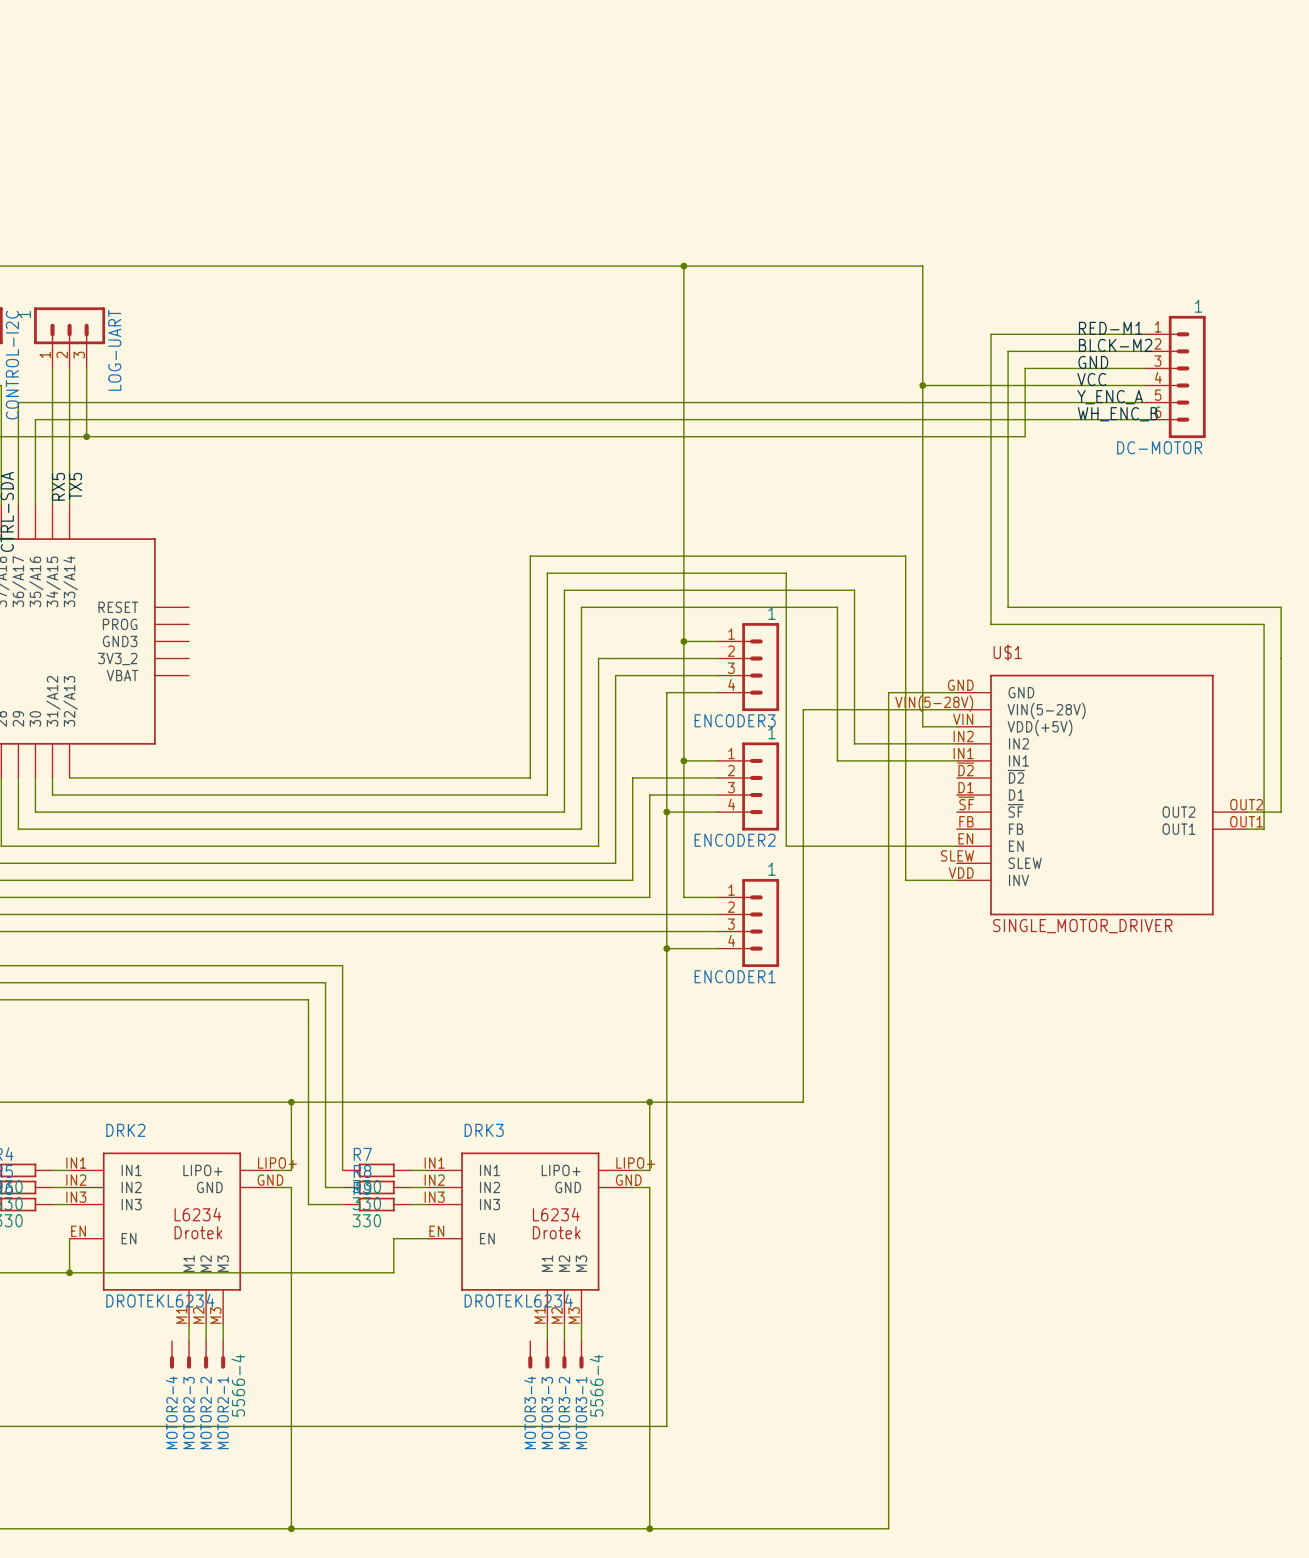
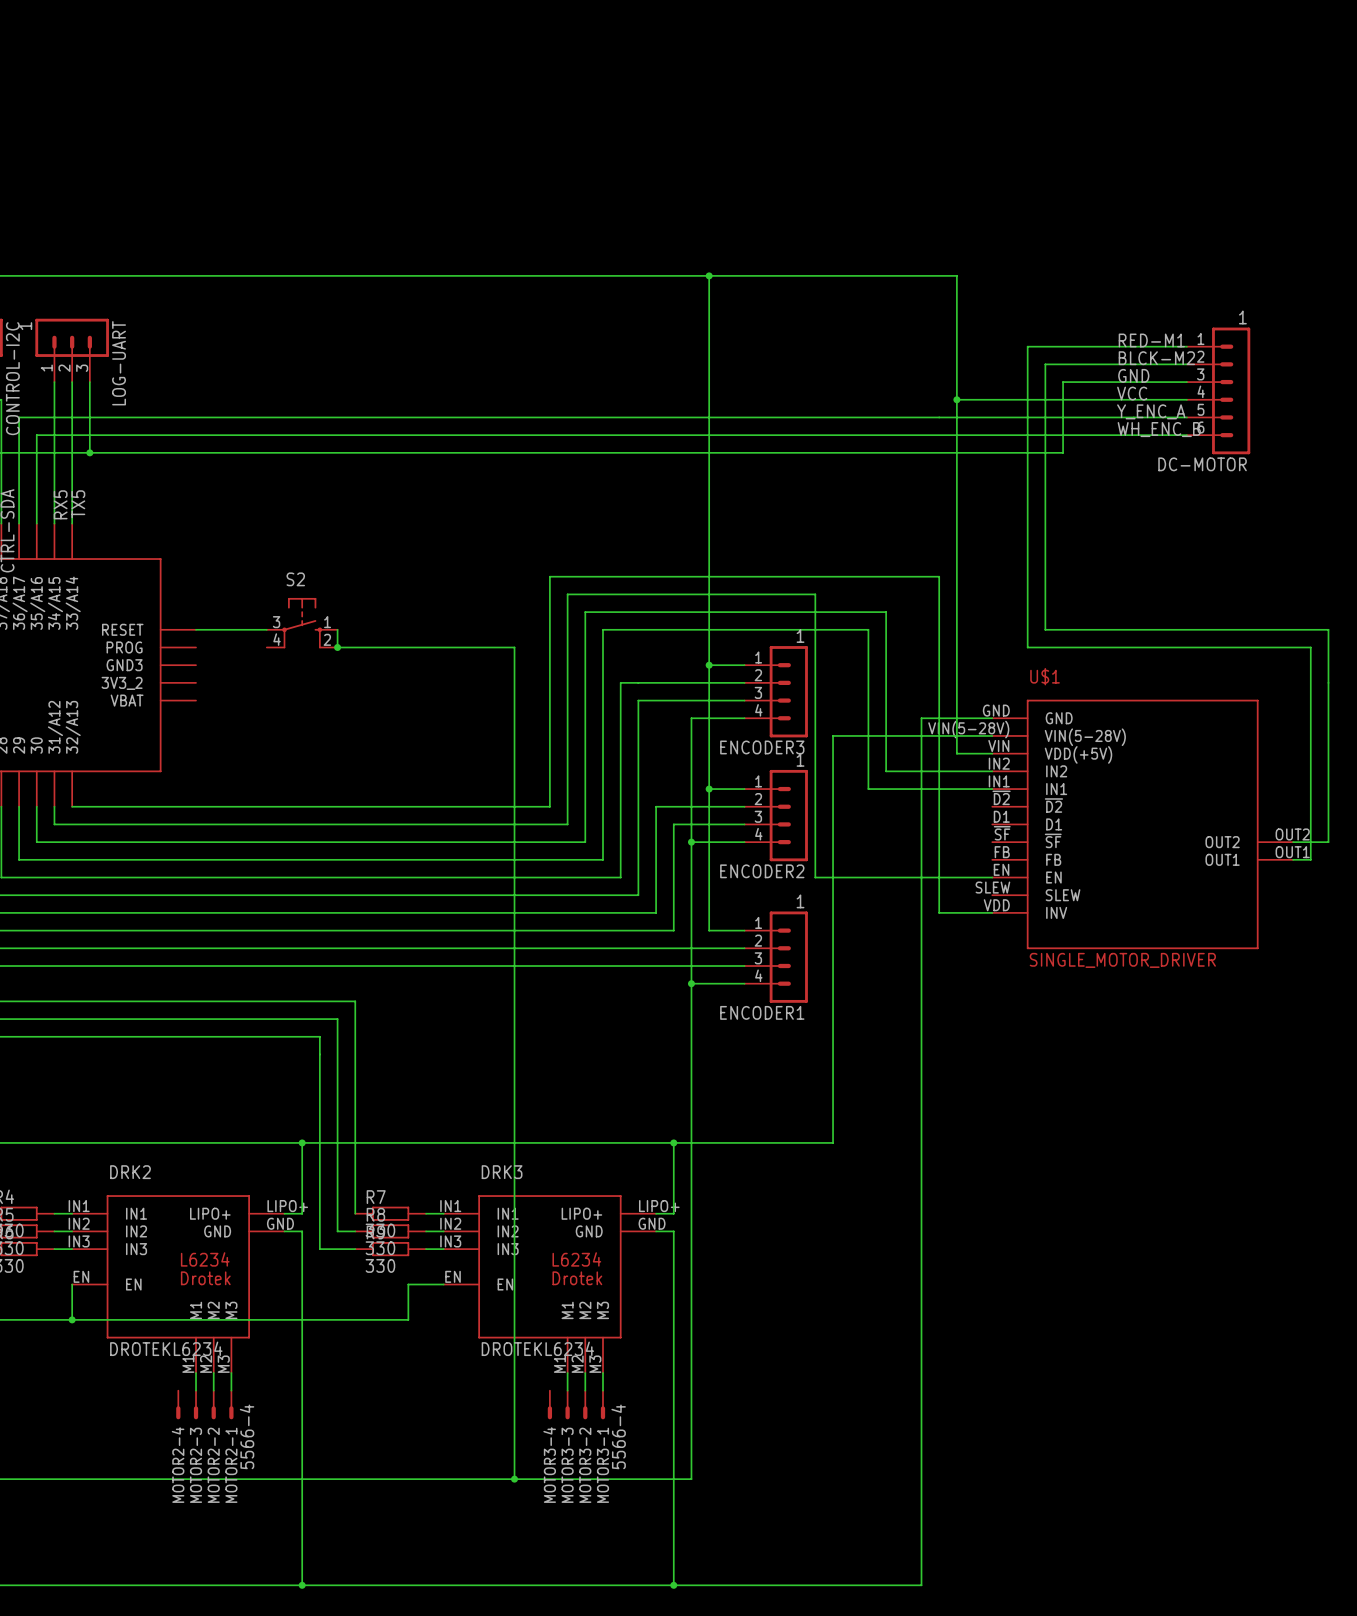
S2: none -> (302, 622)
wire: none -> (196, 629) (266, 629)
wire: none -> (337, 629) (337, 647) (514, 647) (514, 1479)
junction: none -> (337, 647)
junction: none -> (514, 1479)

